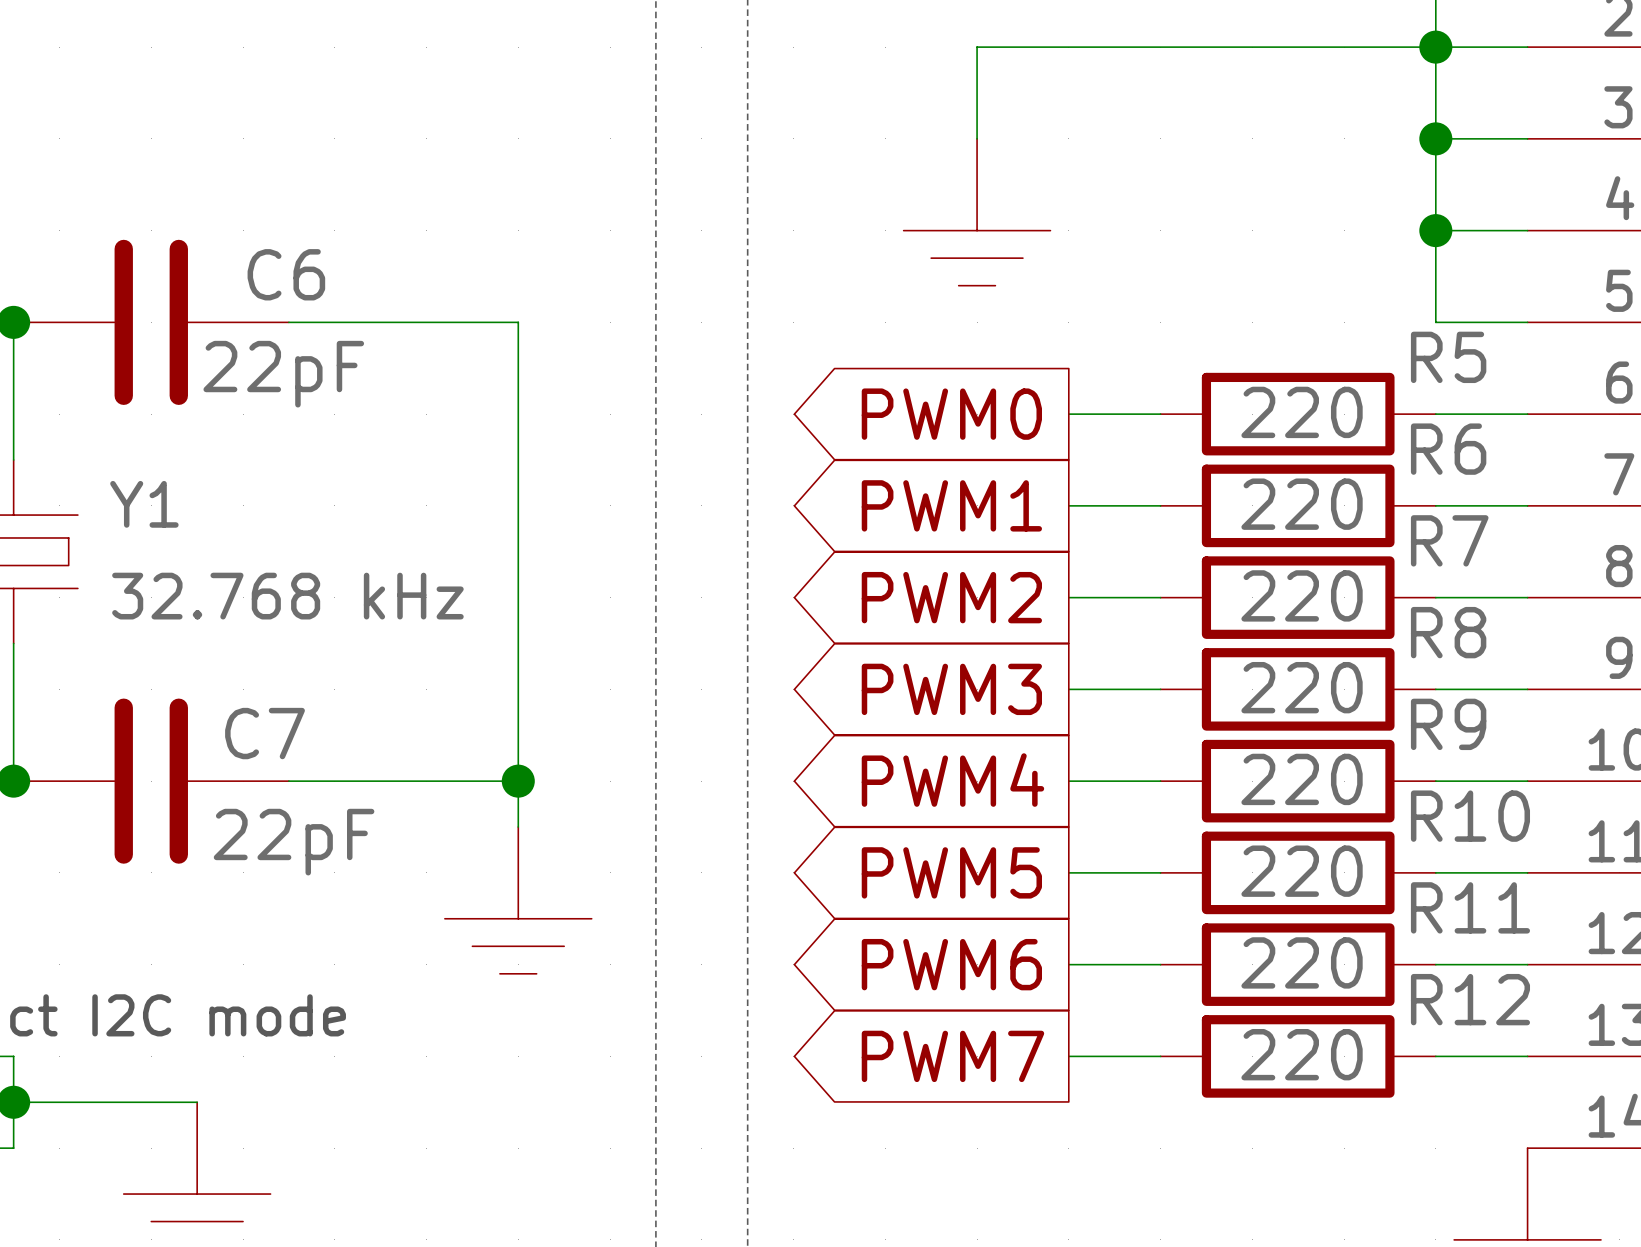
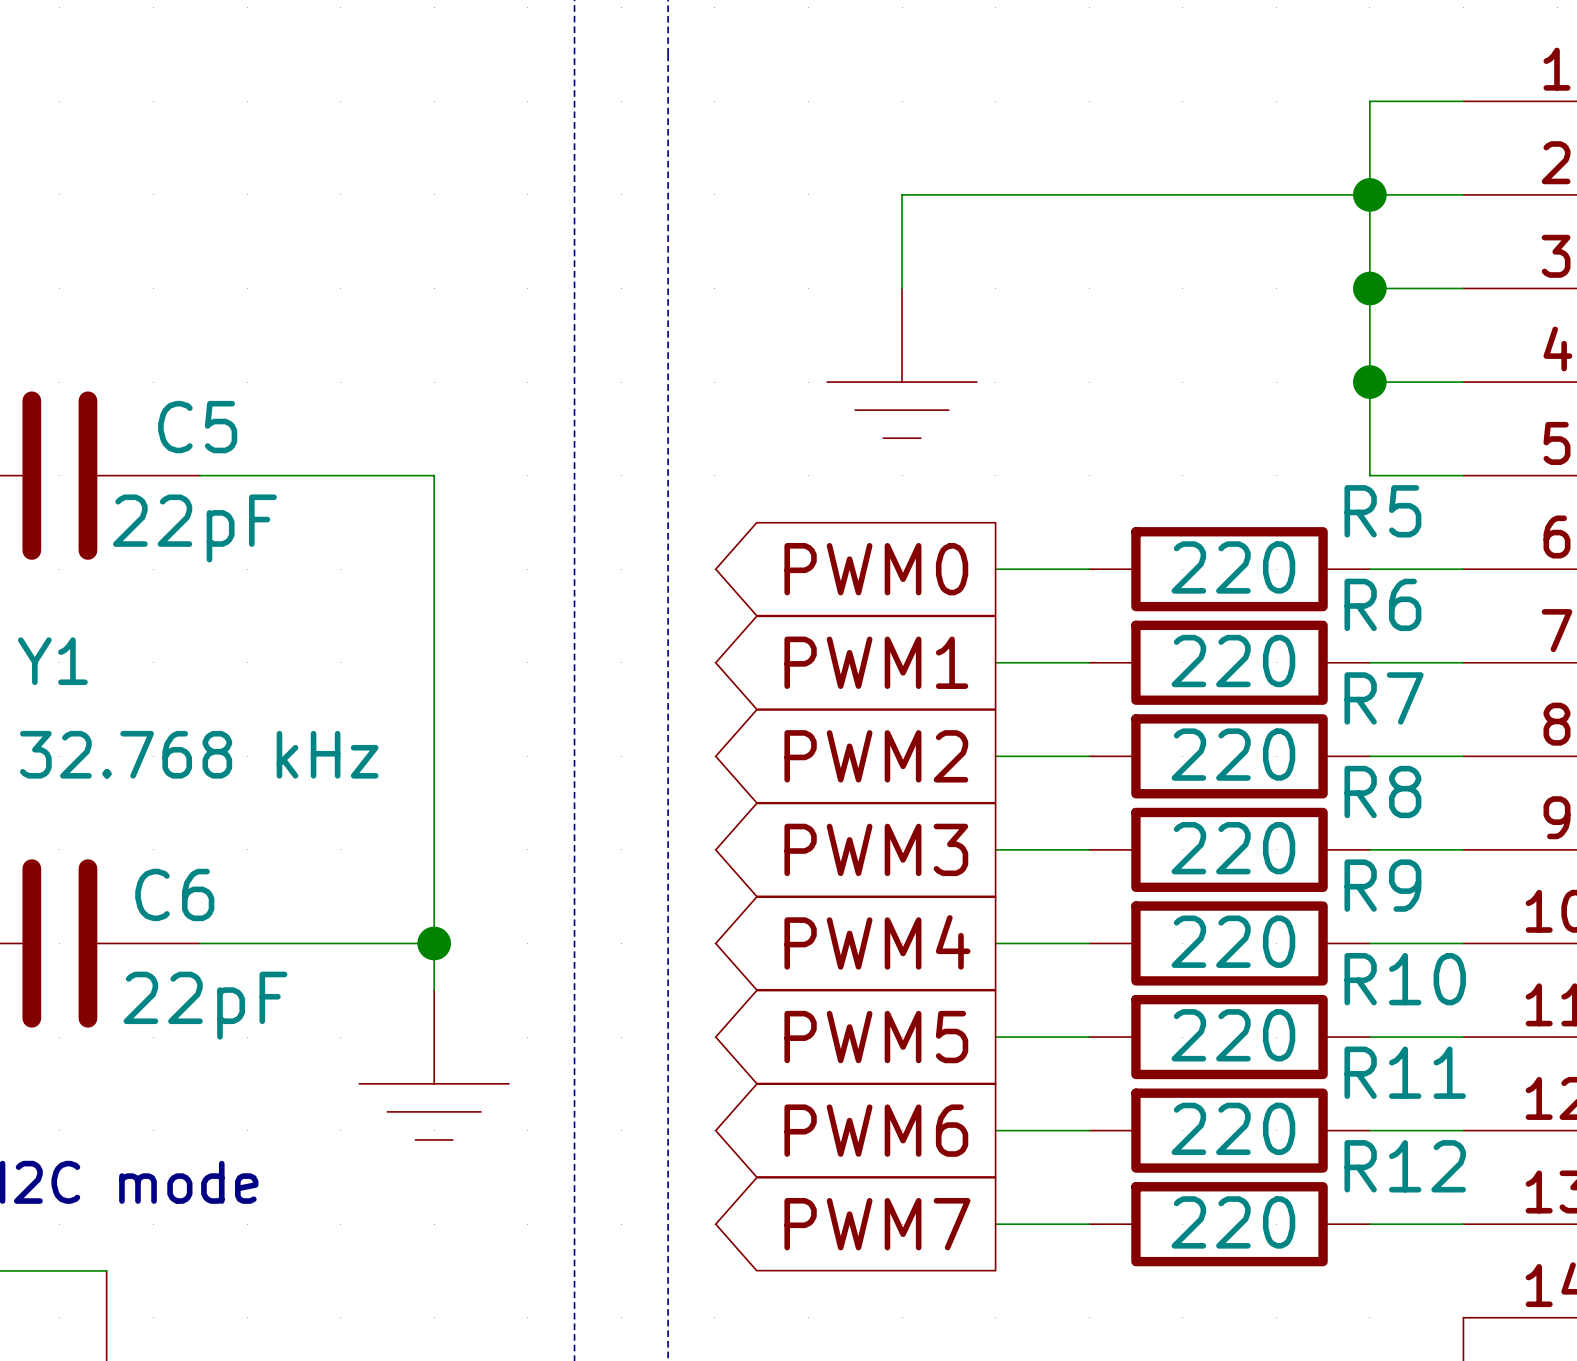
C6 name: C6 (286, 274) -> C5 (197, 427)
C7 name: C7 (265, 733) -> C6 (174, 894)

